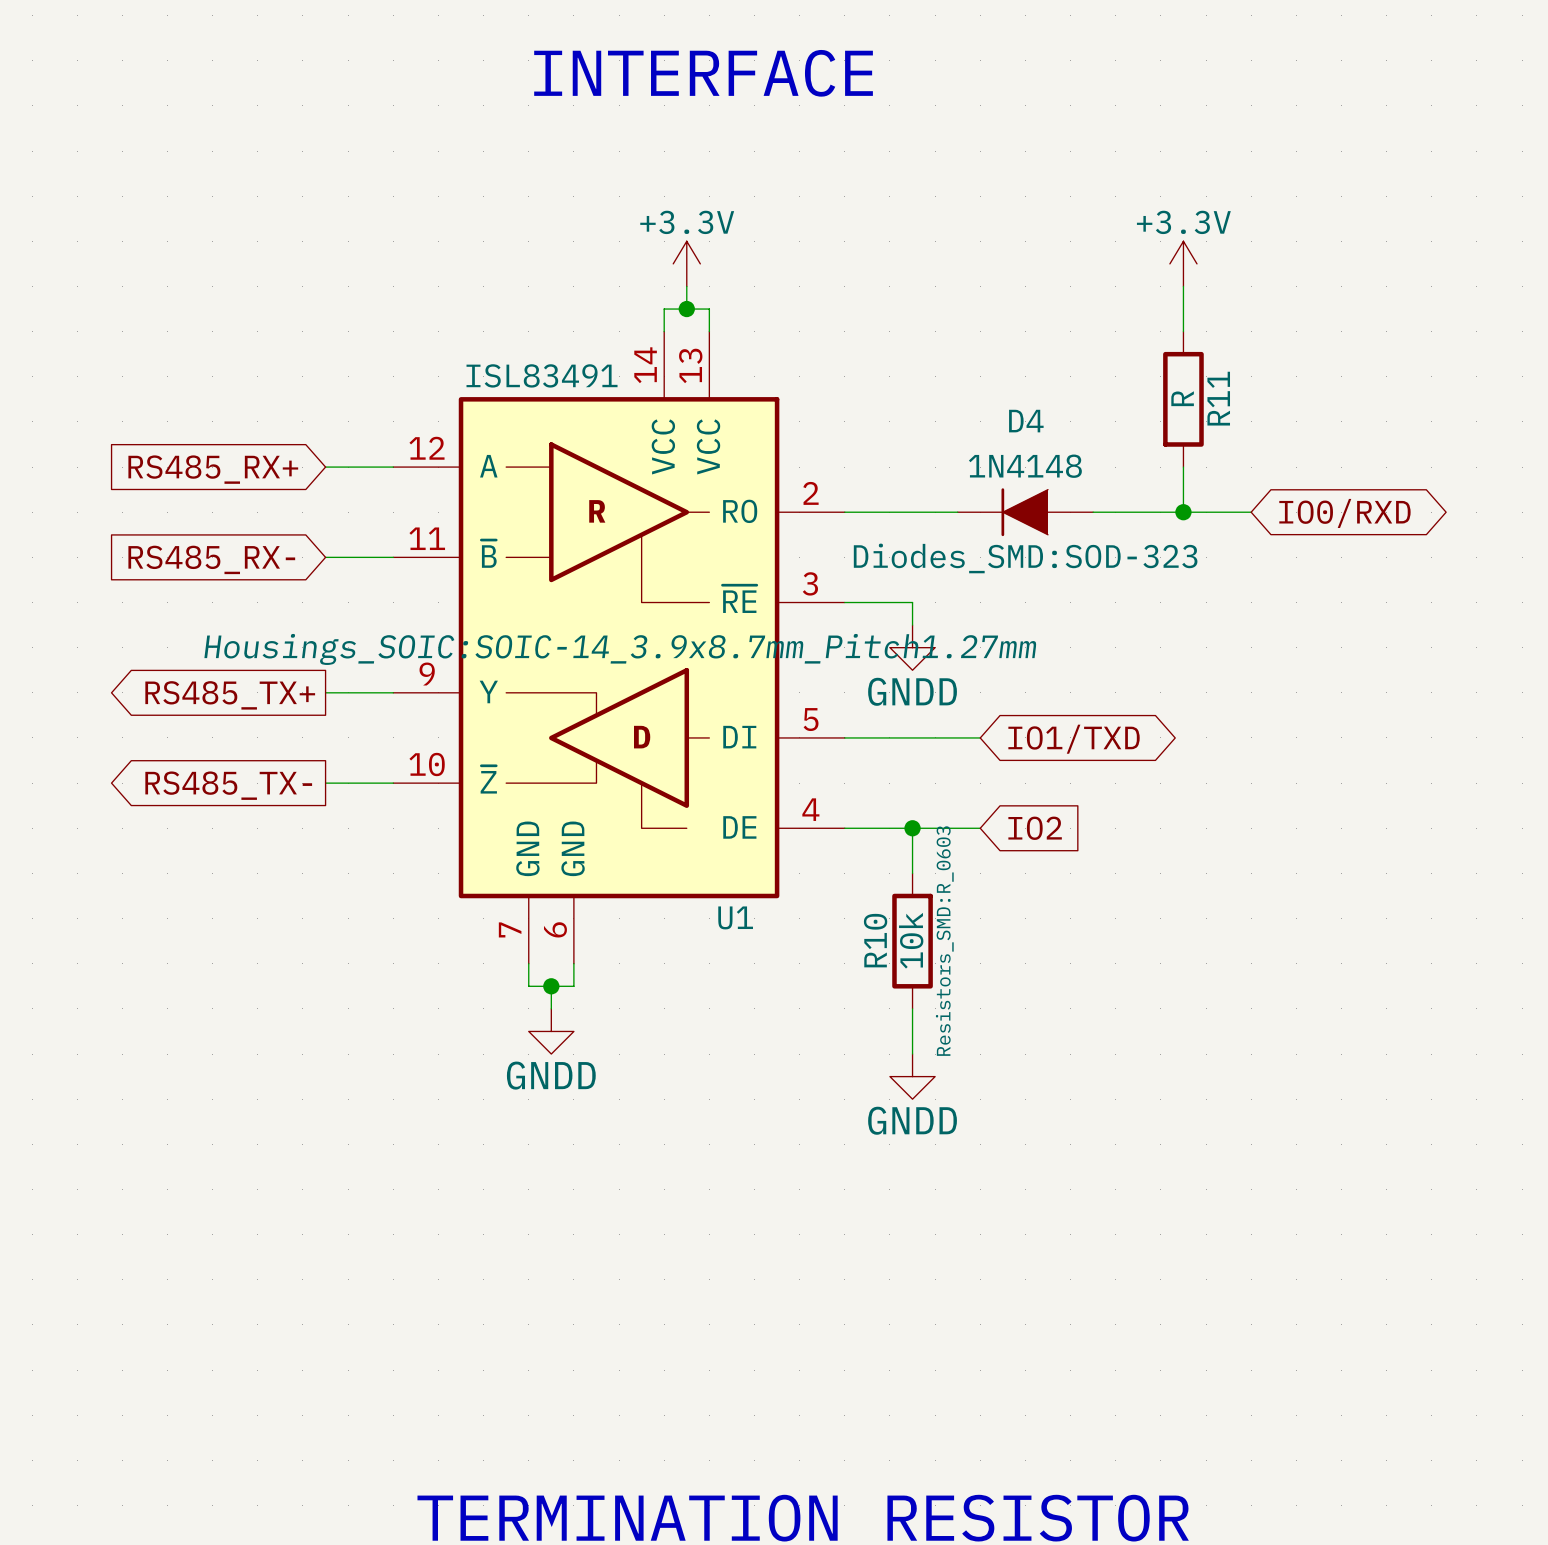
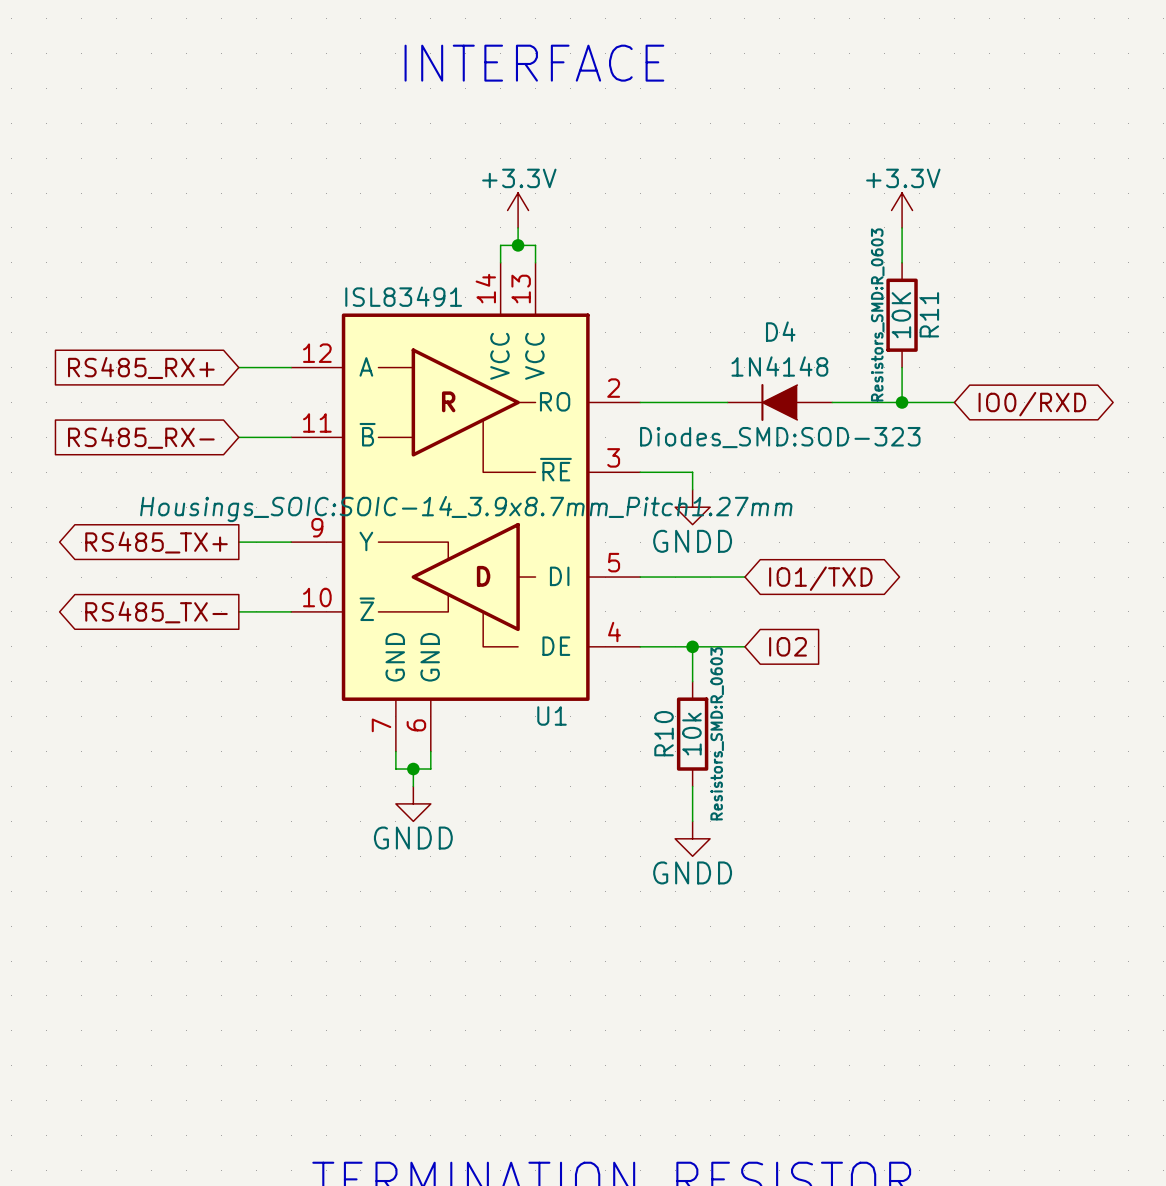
R11 value: R (1182, 398) -> 10K (901, 315)
R11 text: none -> Resistors_SMD:R_0603 (877, 314)

